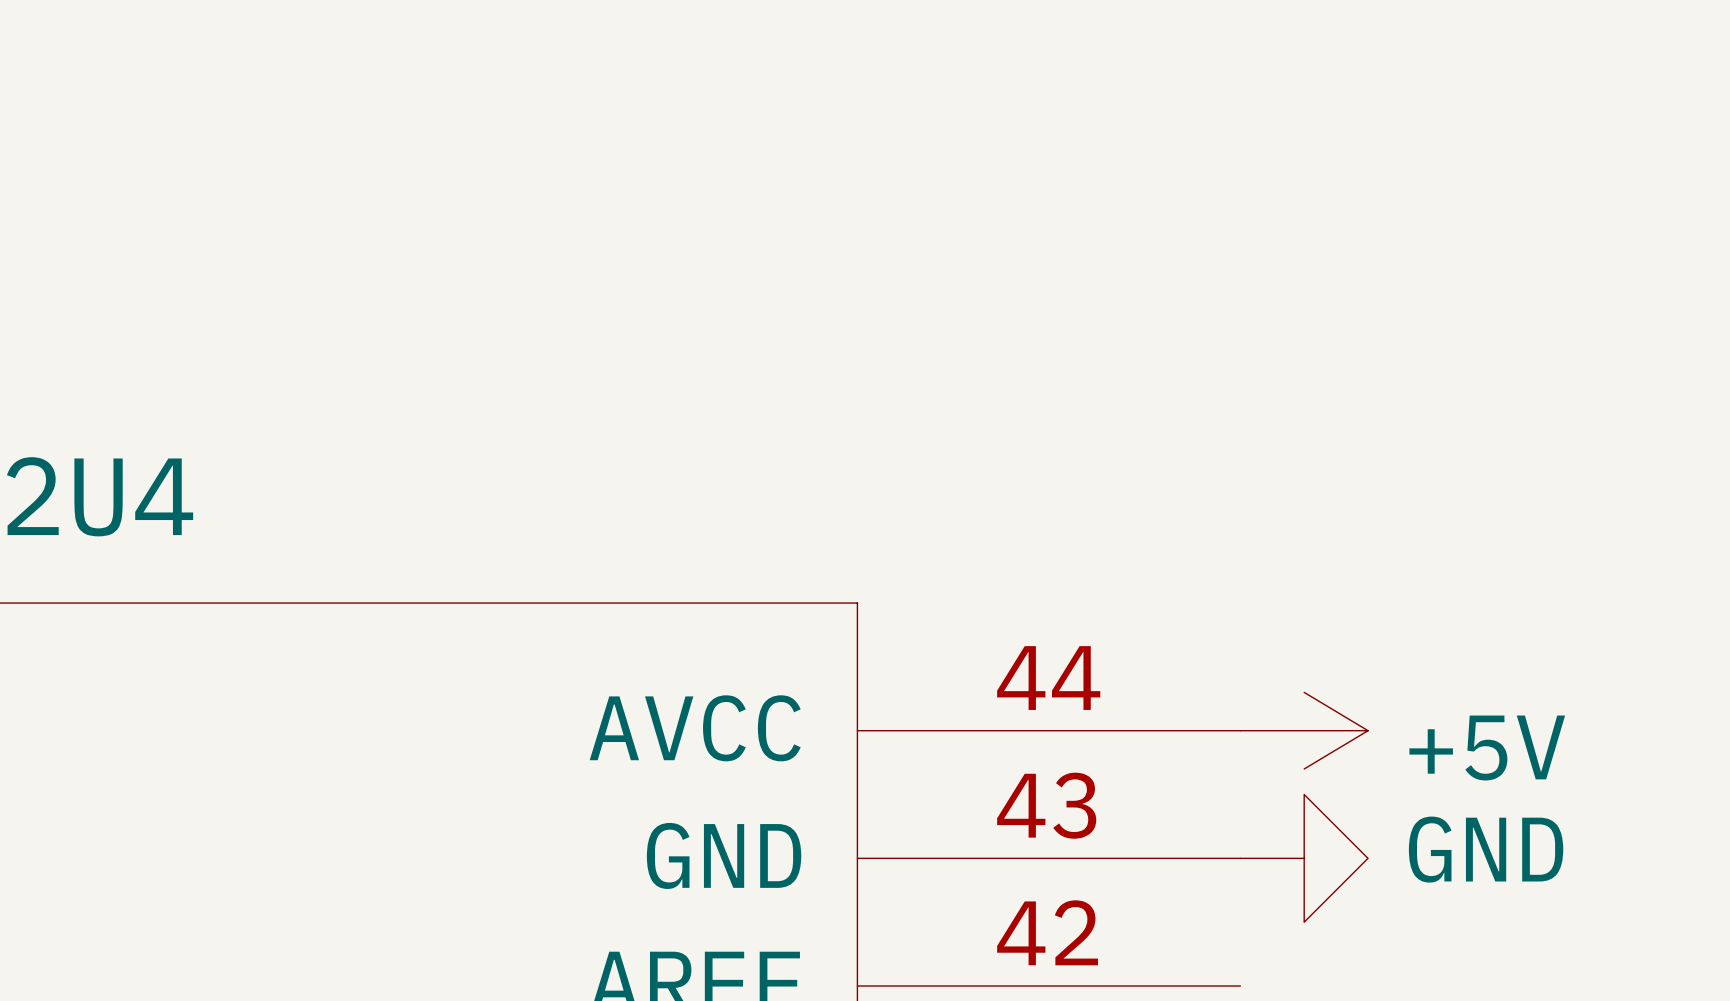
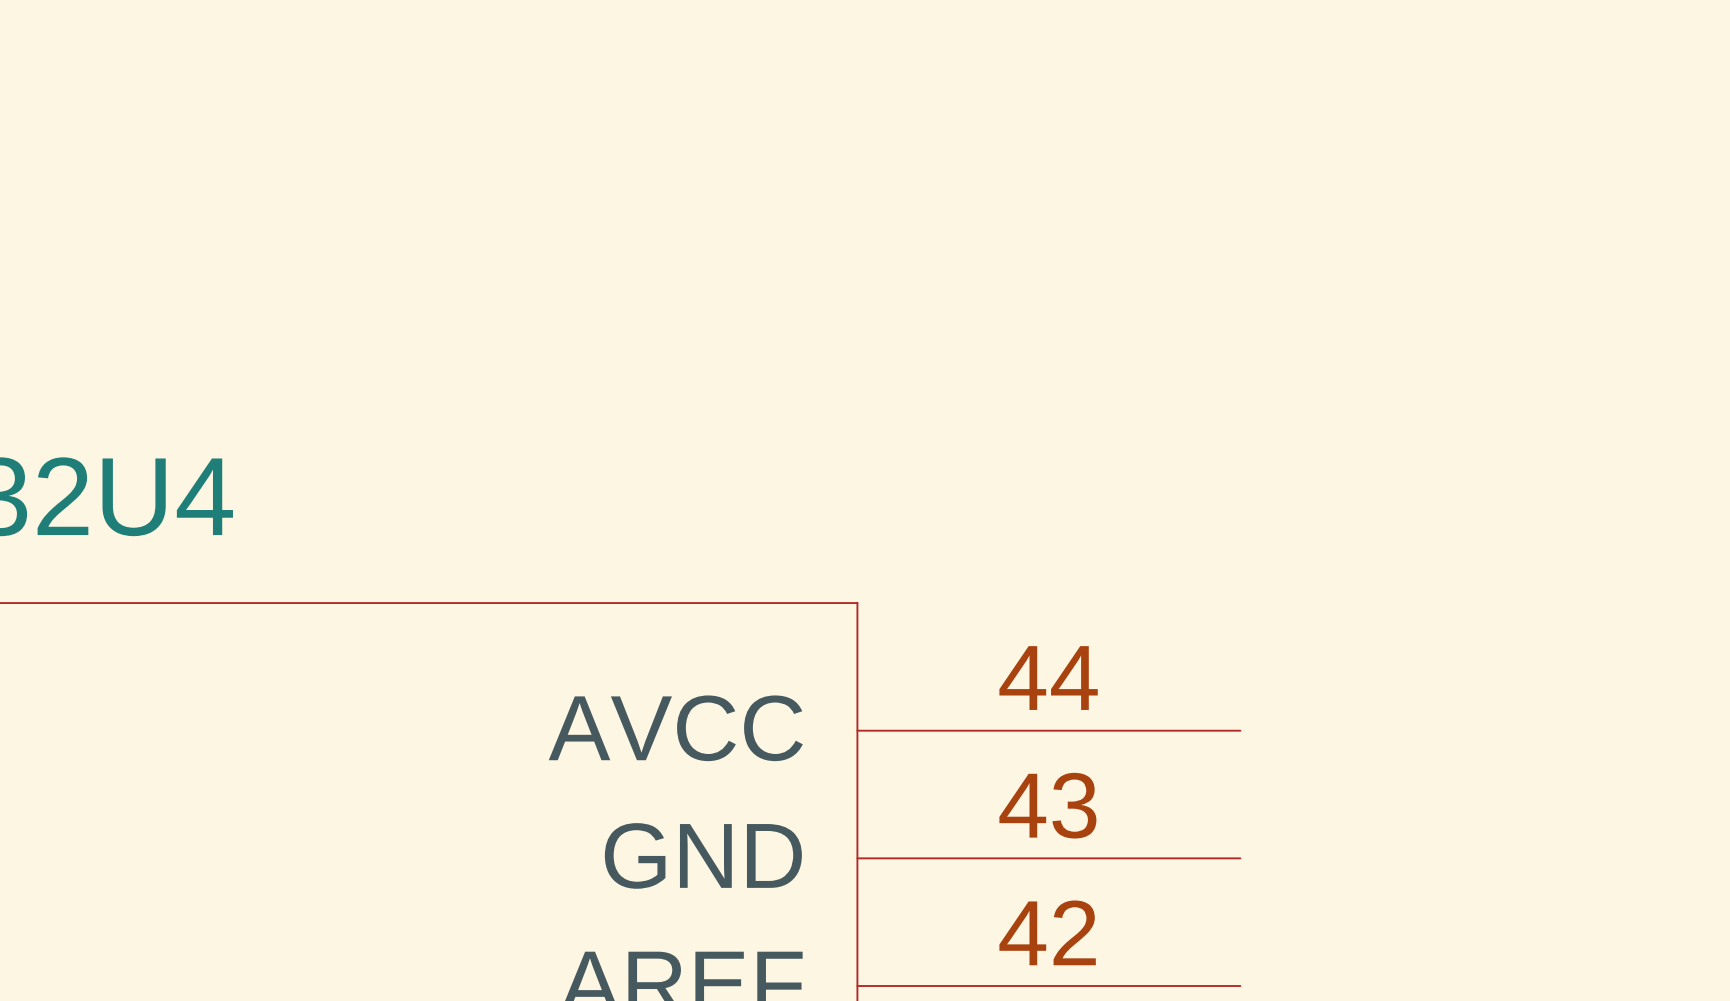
power symbol: +5V (1304, 730) -> none
power symbol: GND (1304, 858) -> none

